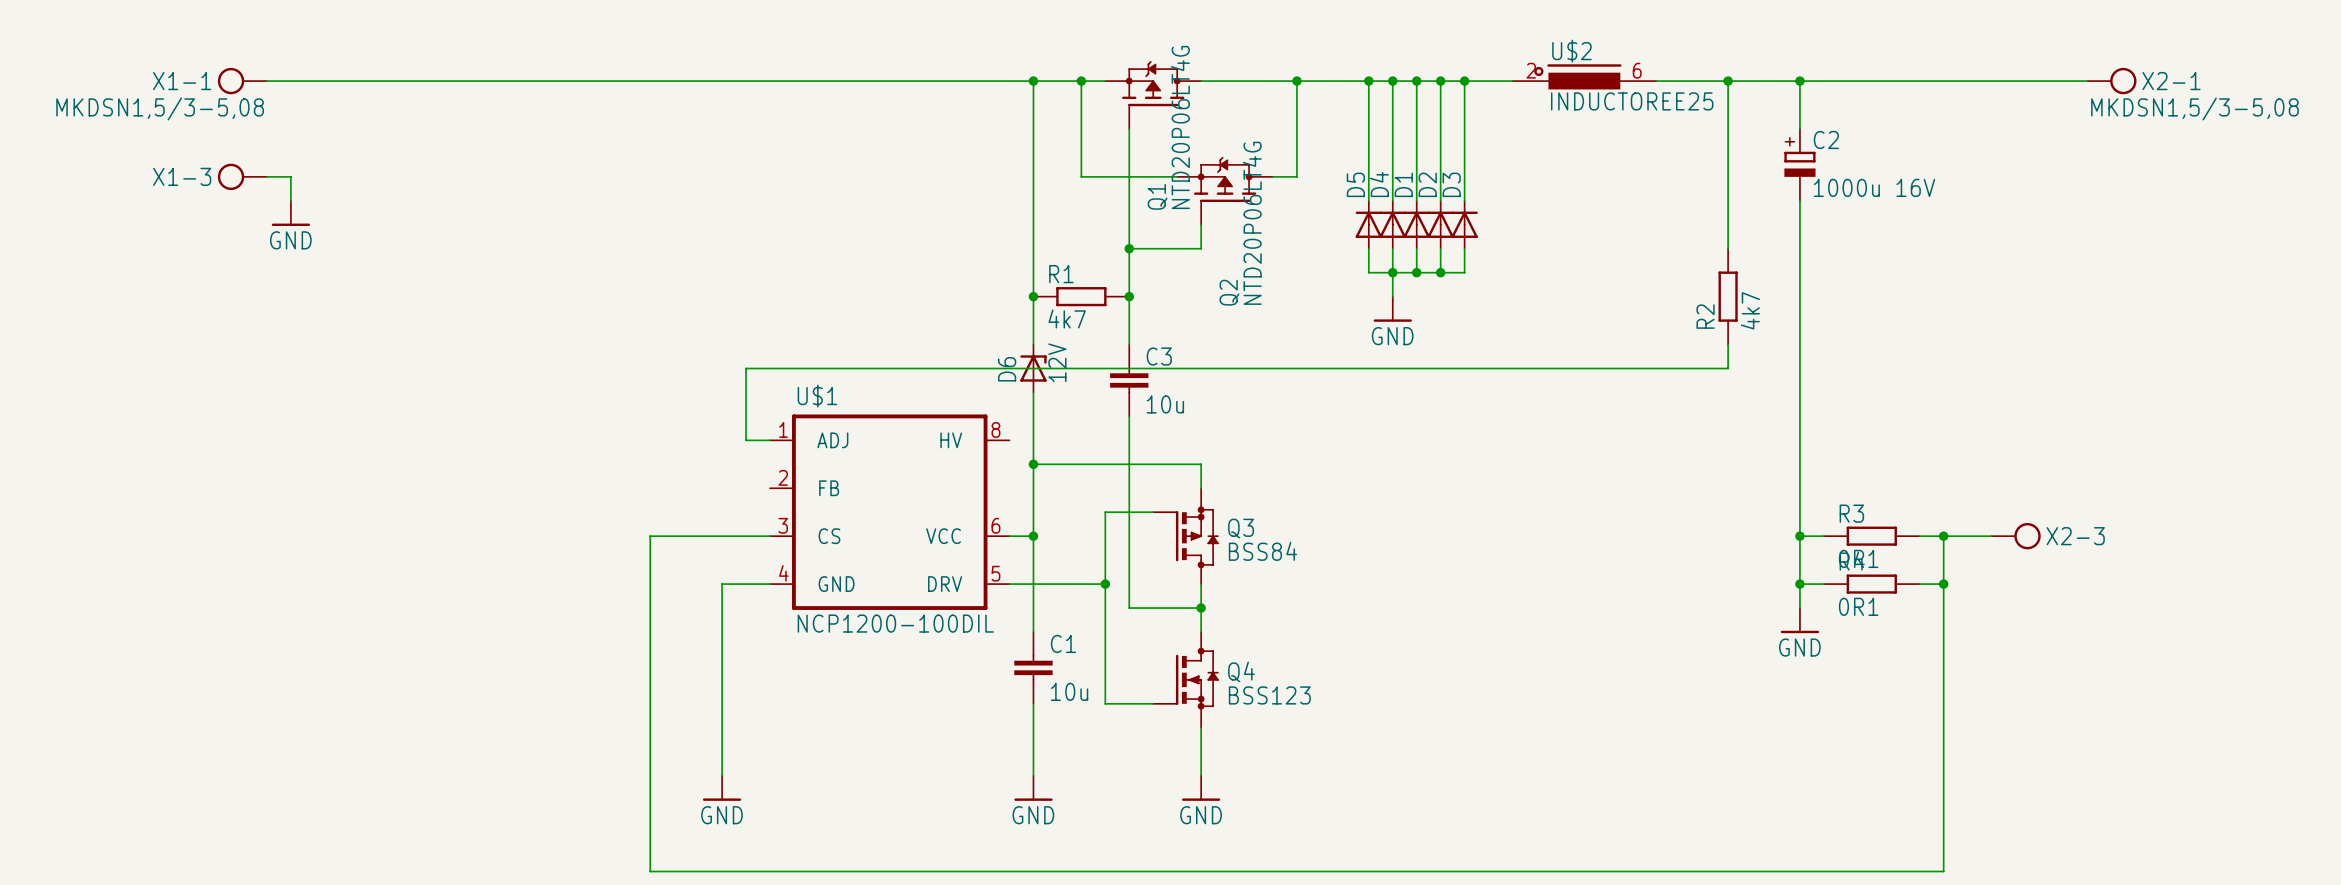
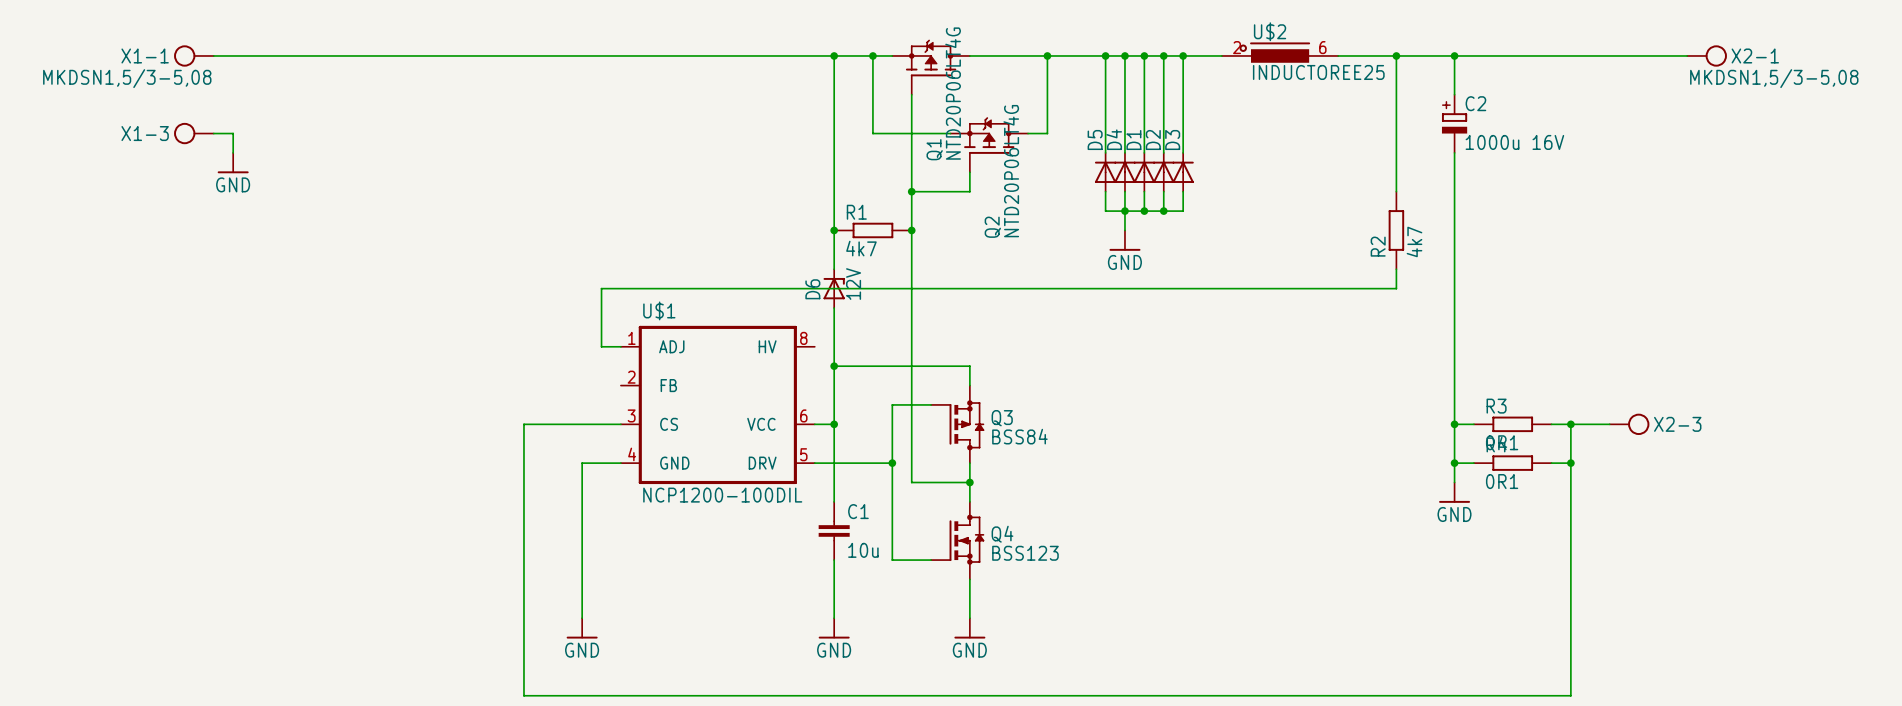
C3: 10u (1129, 380) -> none

